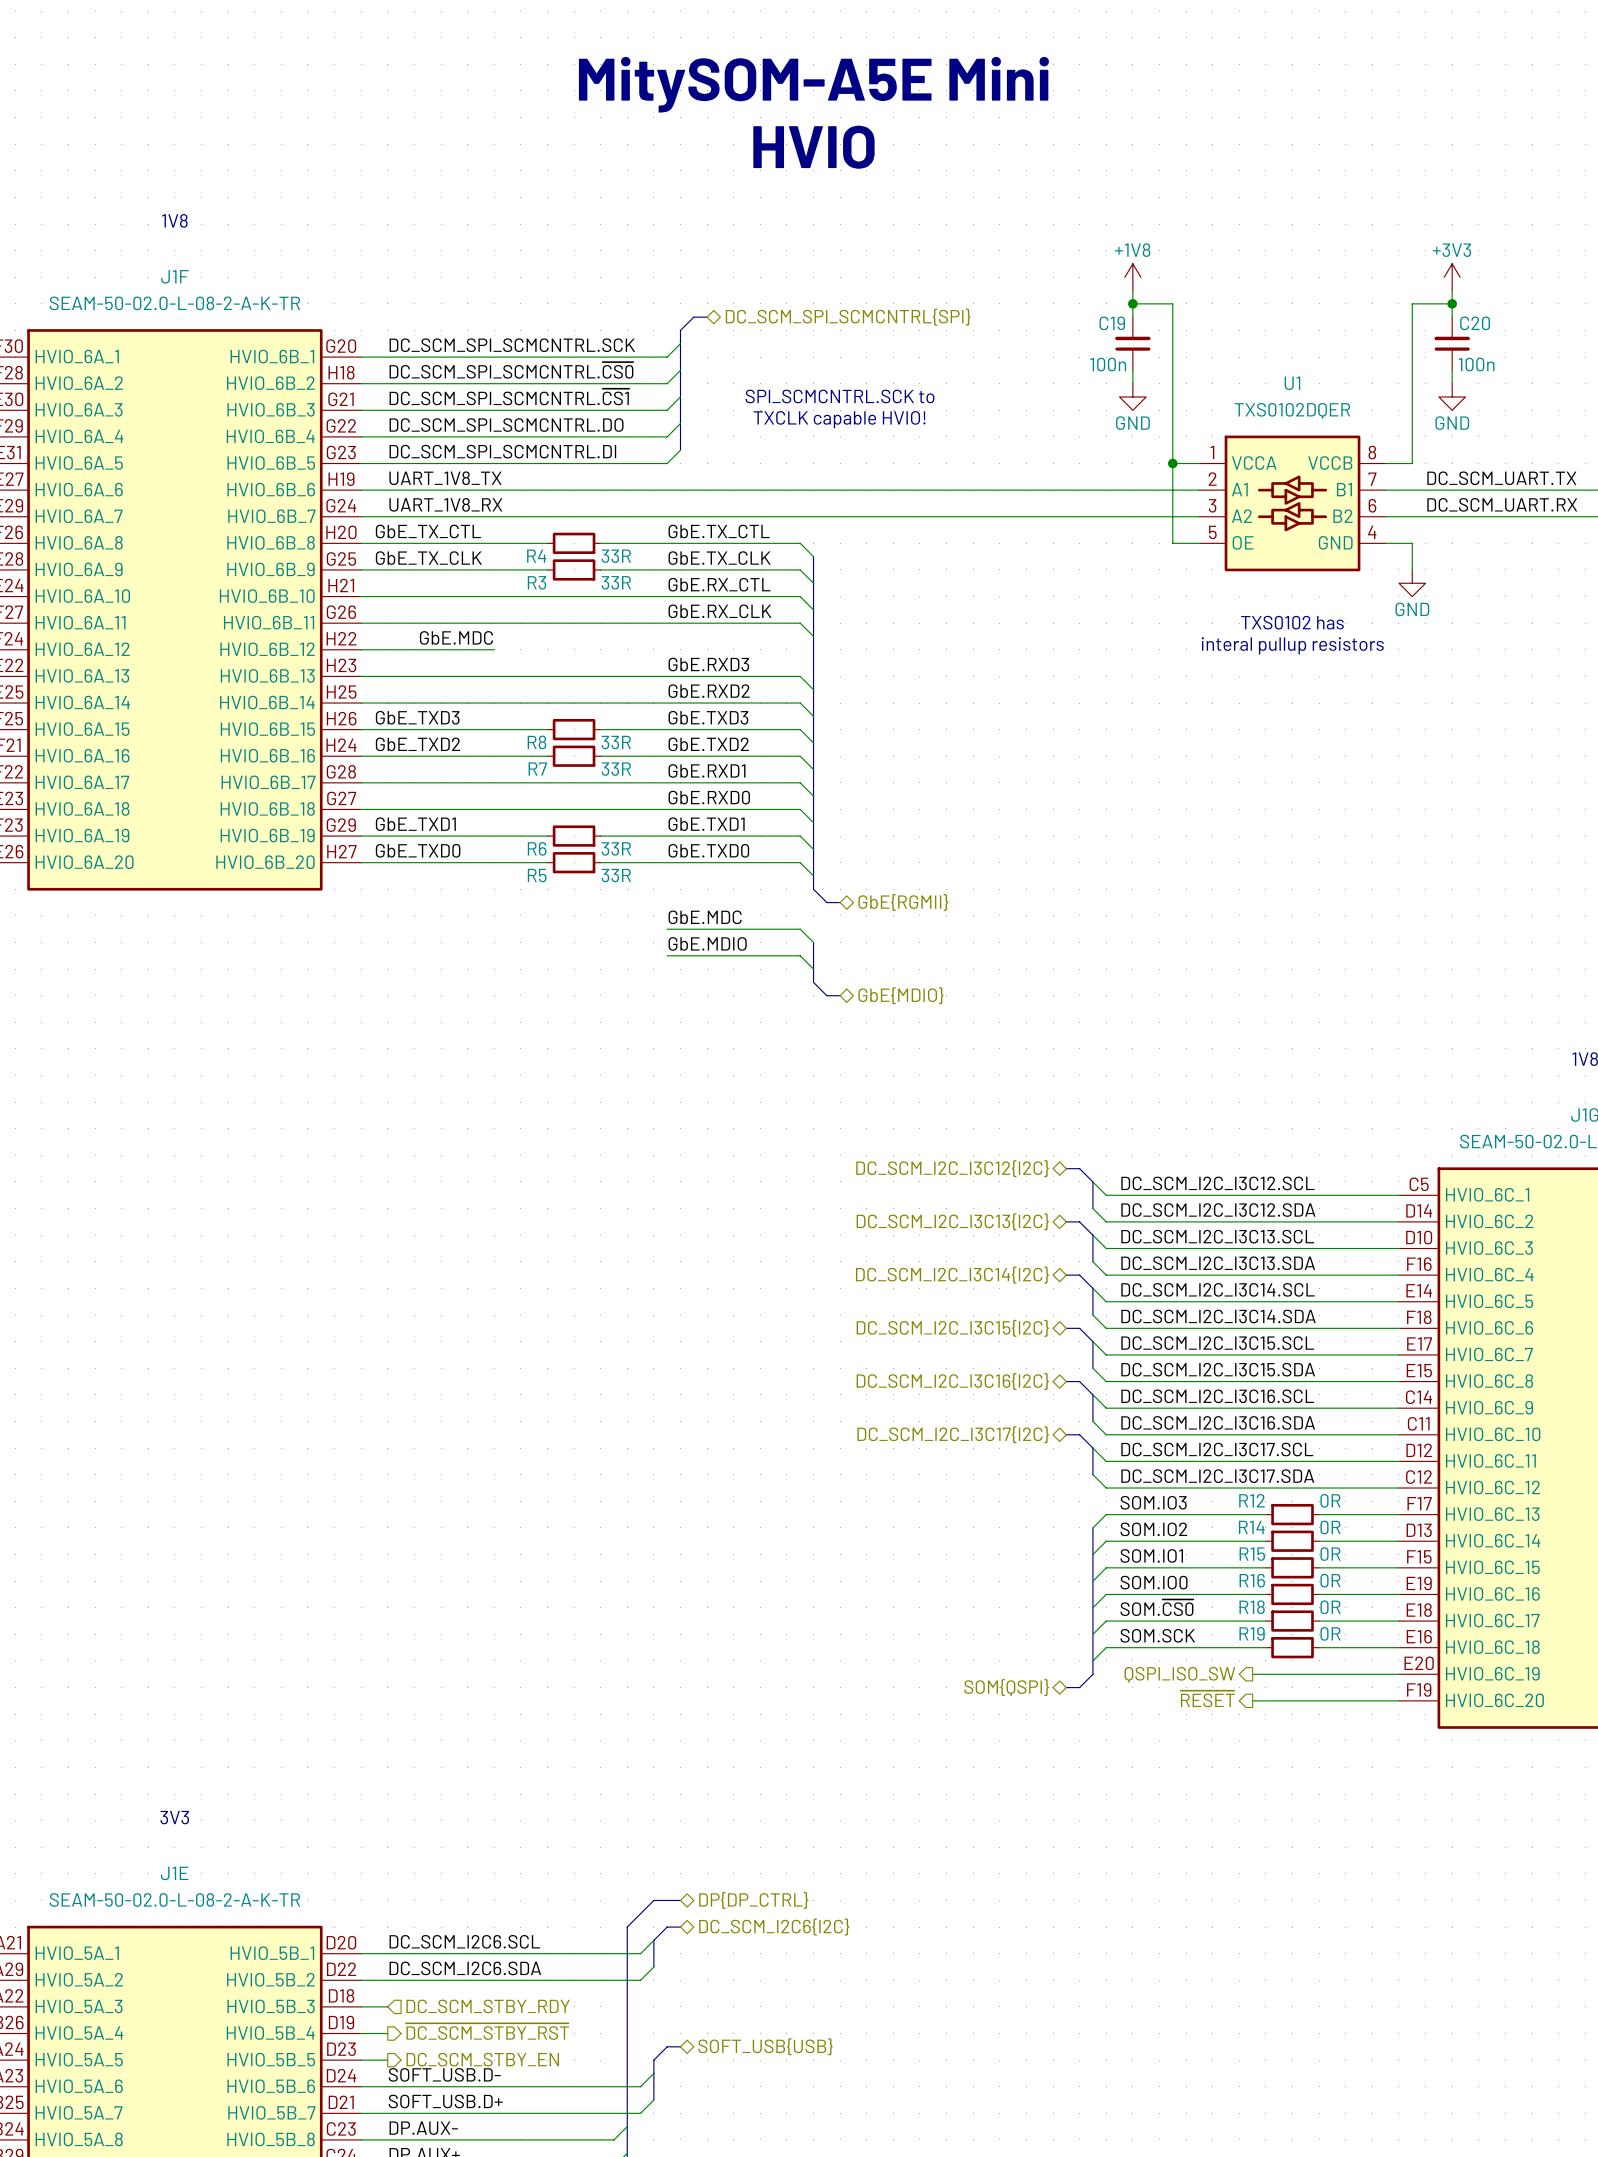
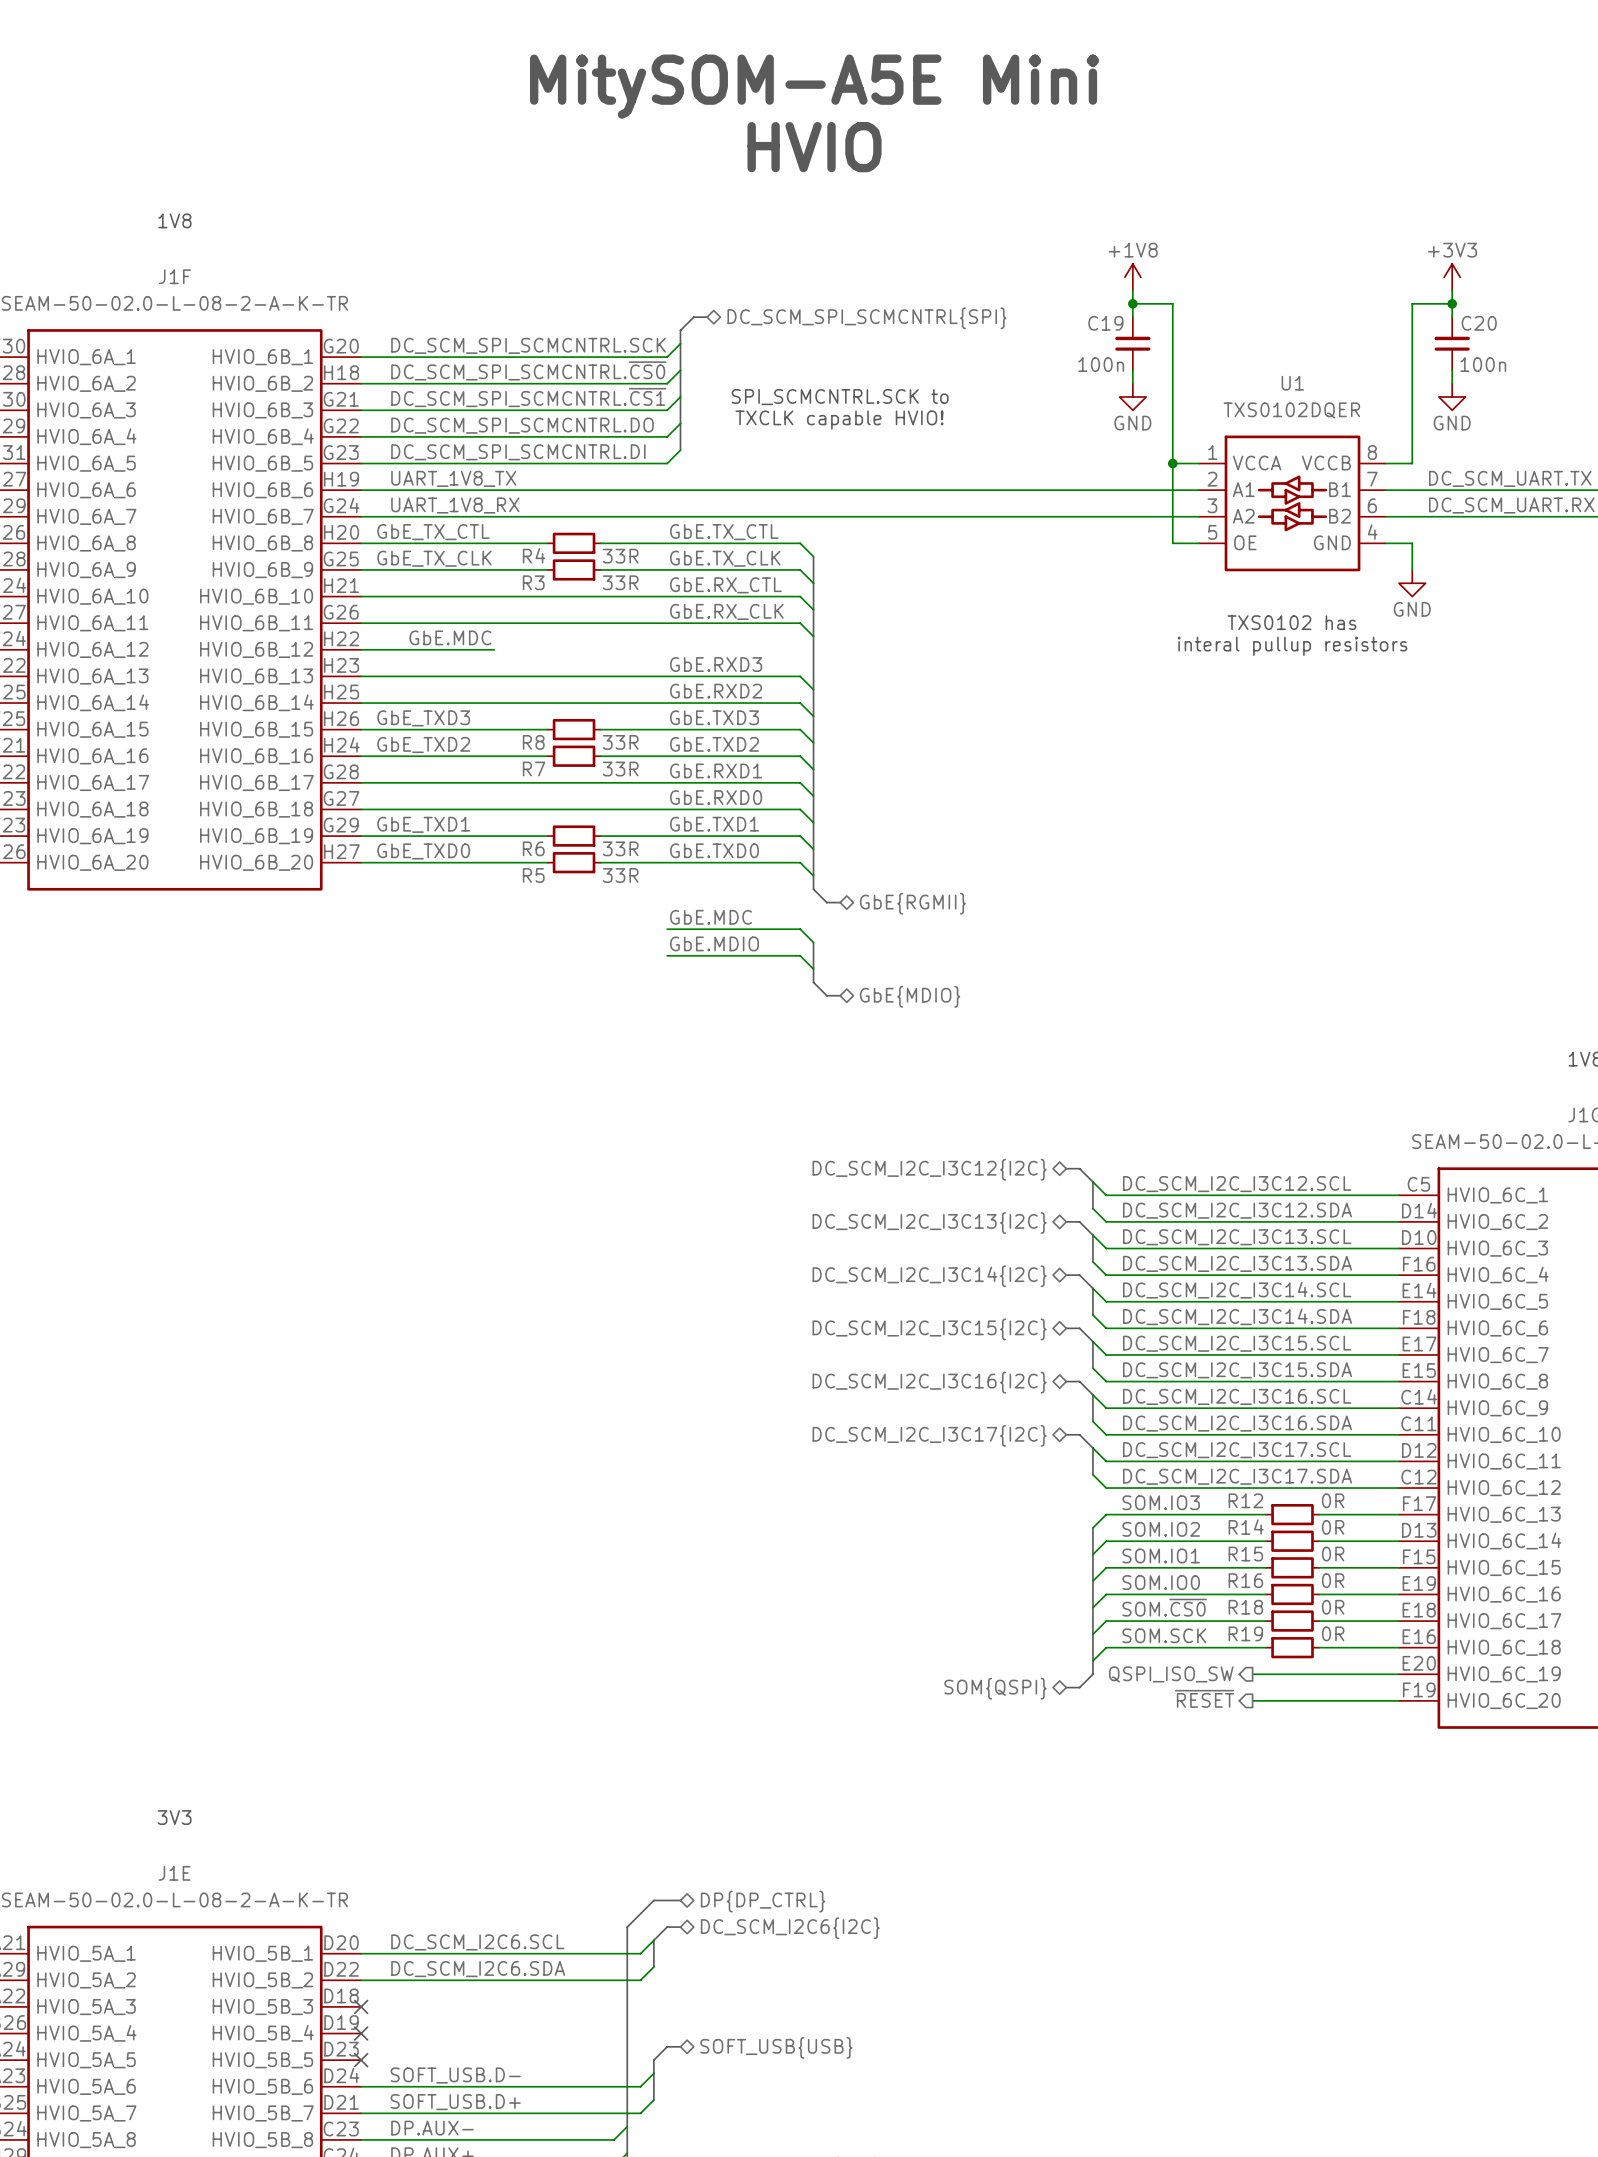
wire: (361, 2006) (387, 2006) -> none
no-connect mark: none -> (361, 2006)
hierarchical label: DC_SCM_STBY_RDY (488, 2006) -> none
hierarchical label: ~{DC_SCM_STBY_RST} (487, 2031) -> none
wire: (361, 2033) (387, 2033) -> none
no-connect mark: none -> (361, 2033)
hierarchical label: DC_SCM_STBY_EN (482, 2059) -> none
wire: (361, 2060) (387, 2060) -> none
no-connect mark: none -> (361, 2060)

